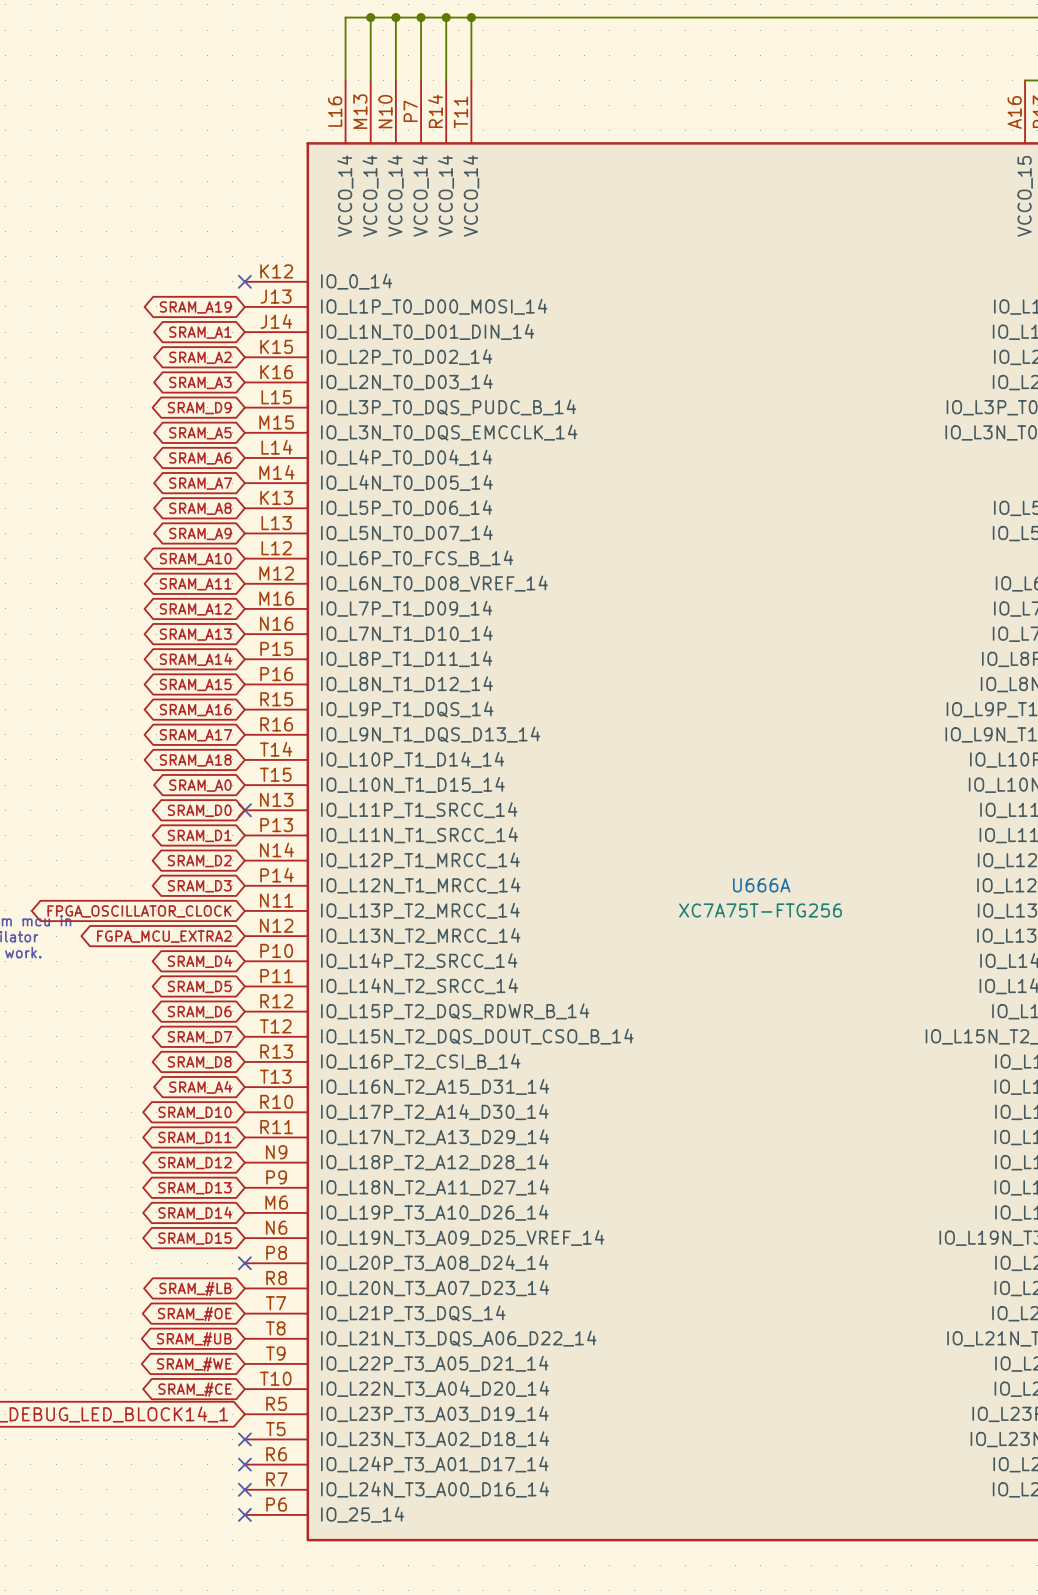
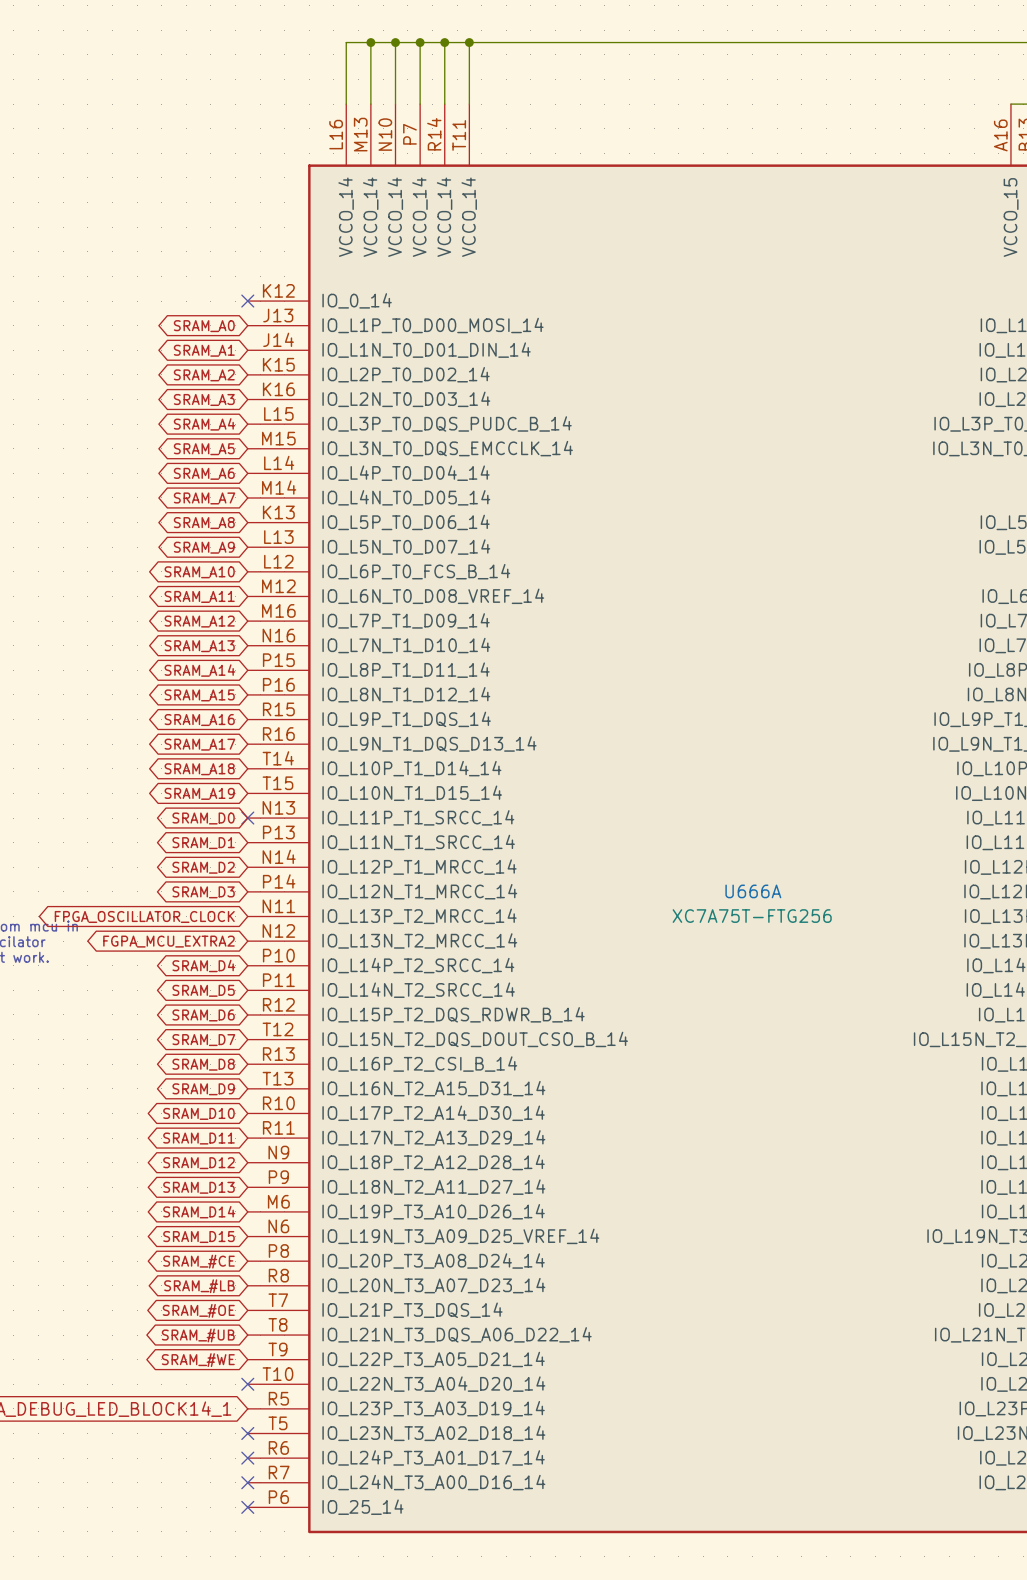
global label: SRAM_A19 (195, 307) -> SRAM_A0 (204, 326)
global label: SRAM_D9 (199, 408) -> SRAM_A4 (204, 424)
global label: SRAM_A0 (200, 785) -> SRAM_A19 (199, 793)
global label: SRAM_A4 (200, 1087) -> SRAM_D9 (203, 1089)
no-connect mark: (244, 1263) -> none
global label position: SRAM_#CE (195, 1389) -> SRAM_#CE (198, 1261)
no-connect mark: none -> (247, 1384)

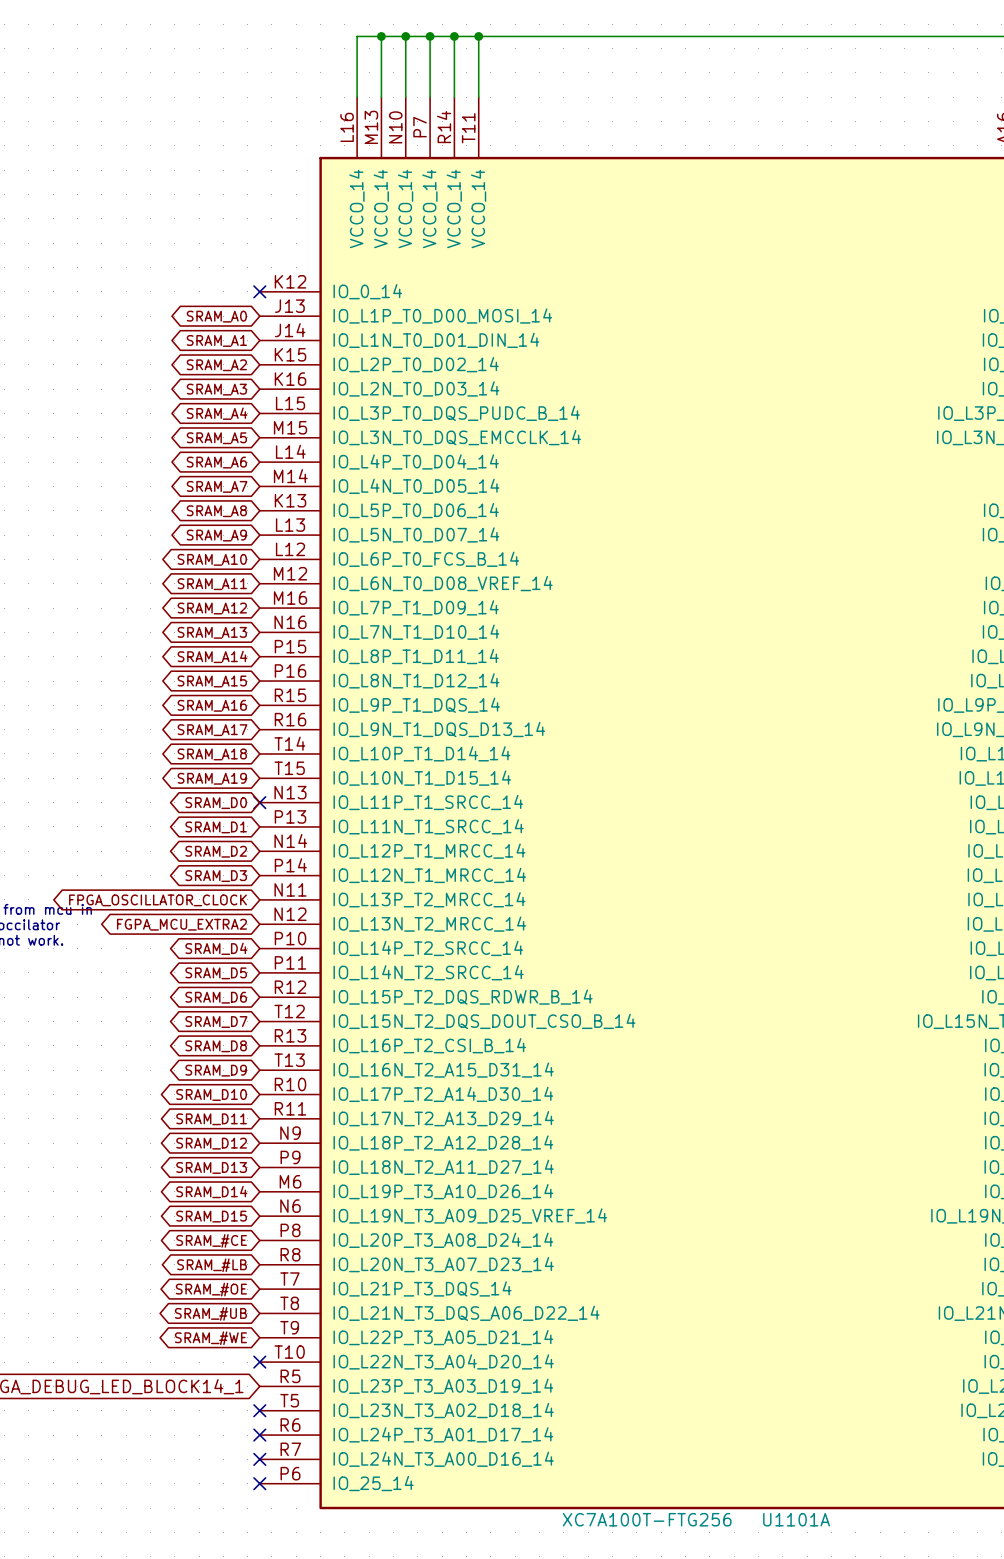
U666A name: U666A (753, 891) -> U1101A (796, 1519)
U666A value: XC7A75T-FTG256 (752, 916) -> XC7A100T-FTG256 (647, 1519)

